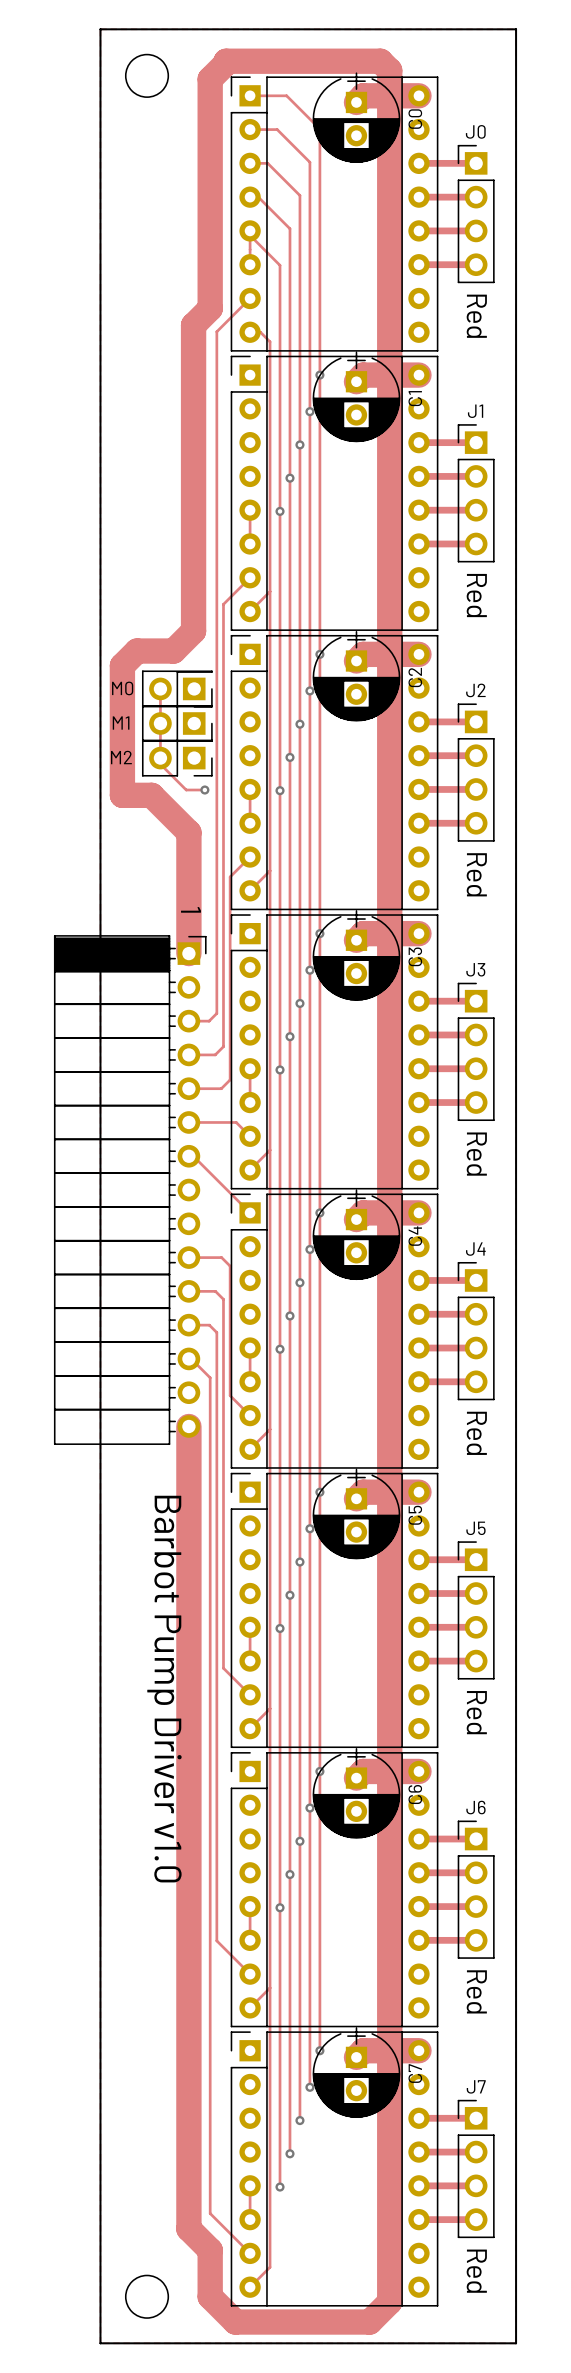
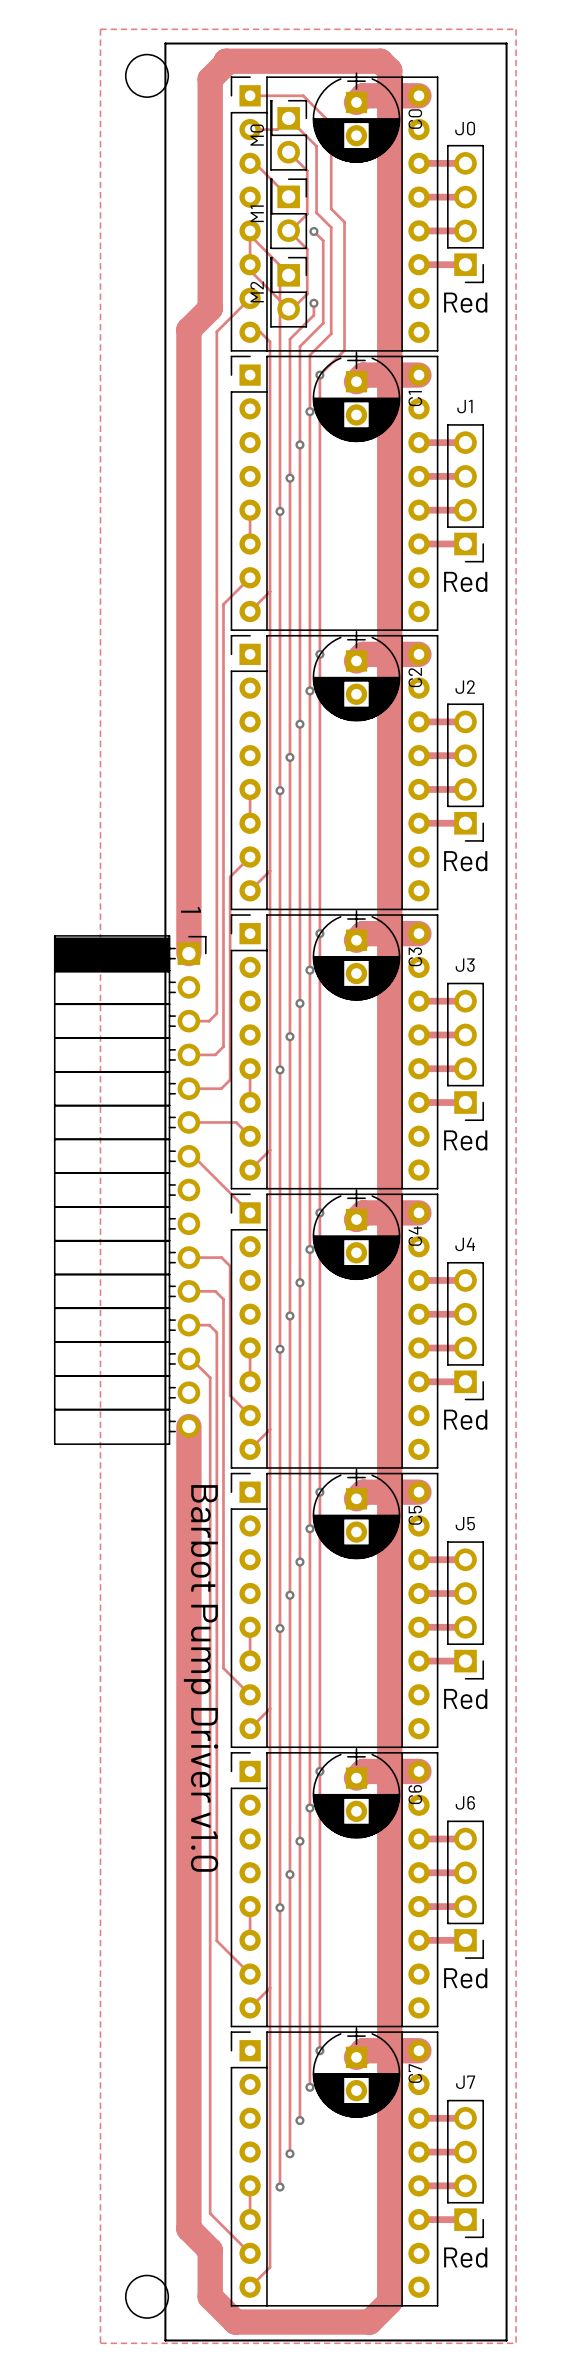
board edge: (100, 29) (516, 29) (516, 2343) (100, 2343) (100, 29) -> (165, 43) (165, 2340) (506, 2340) (506, 43) (165, 43)
track: (286, 95) (319, 129) (319, 375) -> (286, 95) (303, 95) (331, 123) (331, 208) (344, 222) (344, 350) (319, 375)
track: (277, 129) (309, 162) (309, 355) -> (277, 129) (288, 118) (316, 146) (316, 212) (331, 227) (331, 333) (309, 355)
part: none -> M0 (288, 135)
track: none -> (288, 152) (307, 170) (307, 214) (288, 230) (307, 249) (307, 293) (292, 309) (288, 309) (250, 270) (250, 264)
track: (255, 163) (267, 163) (299, 195) (299, 346) -> (313, 231) (323, 240) (323, 323) (299, 346)
track: none -> (255, 163) (288, 196)
track: (258, 197) (289, 228) (289, 339) -> (313, 303) (313, 315) (289, 339)
part: none -> M1 (288, 213)
J0 rotation: 0° (476, 214) -> 180° (465, 214)
via: none -> (313, 231)
part: none -> M2 (288, 292)
via: none -> (313, 303)
text rotation: 0° (476, 316) -> 90° counterclockwise (465, 302)
track: (193, 325) (193, 631) (173, 651) (137, 651) (122, 665) (122, 795) (151, 795) (188, 832) -> (193, 325) (188, 329) (188, 832)
J1 rotation: 0° (476, 493) -> 180° (465, 493)
text rotation: 0° (476, 595) -> 90° counterclockwise (465, 581)
track: (160, 688) (160, 764) (186, 790) (204, 790) -> none
M0: (177, 688) -> none
M1: (177, 723) -> none
M2: (177, 758) -> none
J2 rotation: 0° (476, 772) -> 180° (465, 772)
via: (204, 790) -> none
text rotation: 0° (476, 874) -> 90° counterclockwise (465, 861)
J3 rotation: 0° (476, 1051) -> 180° (465, 1051)
text rotation: 0° (476, 1154) -> 90° counterclockwise (465, 1140)
J4 rotation: 0° (476, 1331) -> 180° (465, 1331)
text rotation: 0° (476, 1433) -> 90° counterclockwise (465, 1419)
J5 rotation: 0° (476, 1610) -> 180° (465, 1610)
text position: Barbot Pump Driver v1.0 (164, 1689) -> Barbot Pump Driver v1.0 (201, 1678)
text rotation: 0° (476, 1712) -> 90° counterclockwise (465, 1699)
J6 rotation: 0° (476, 1889) -> 180° (465, 1889)
text rotation: 0° (476, 1991) -> 90° counterclockwise (465, 1978)
J7 rotation: 0° (476, 2168) -> 180° (465, 2168)
text rotation: 0° (476, 2271) -> 90° counterclockwise (465, 2257)

